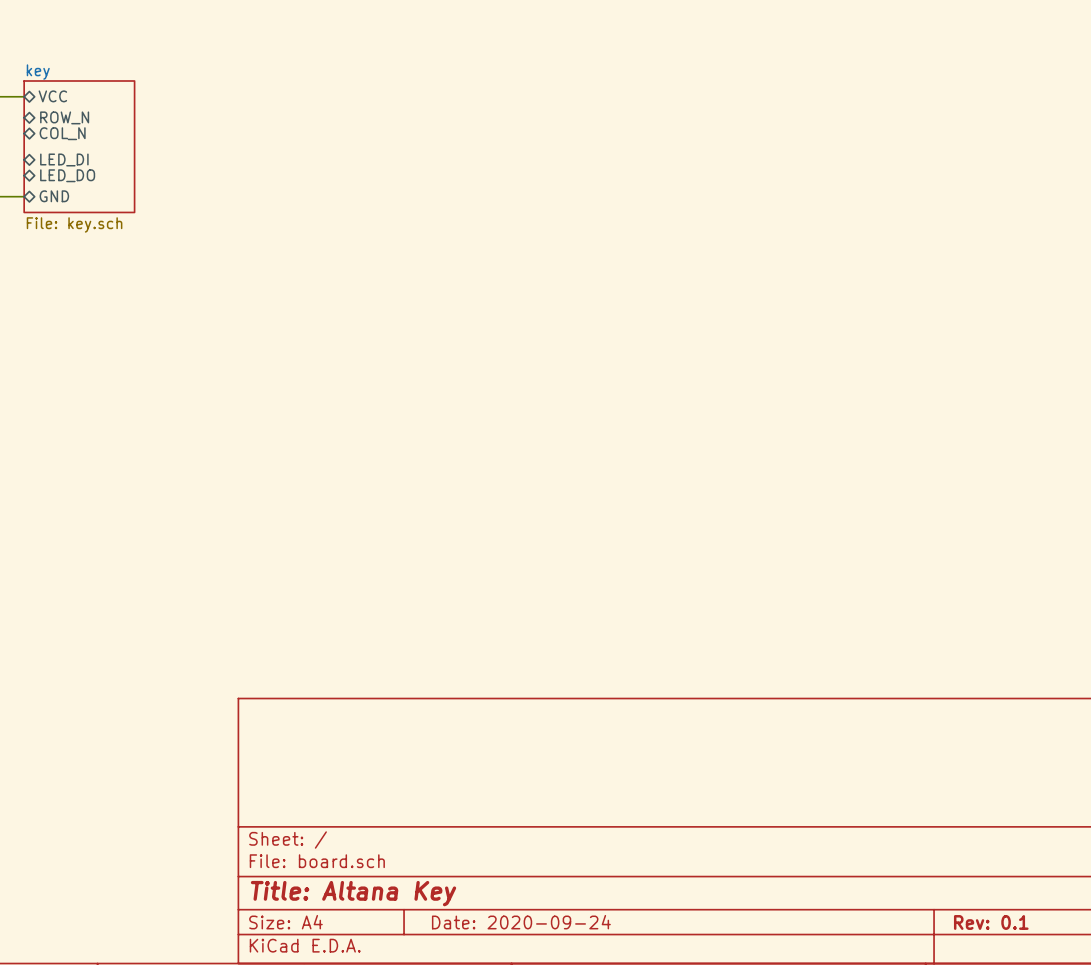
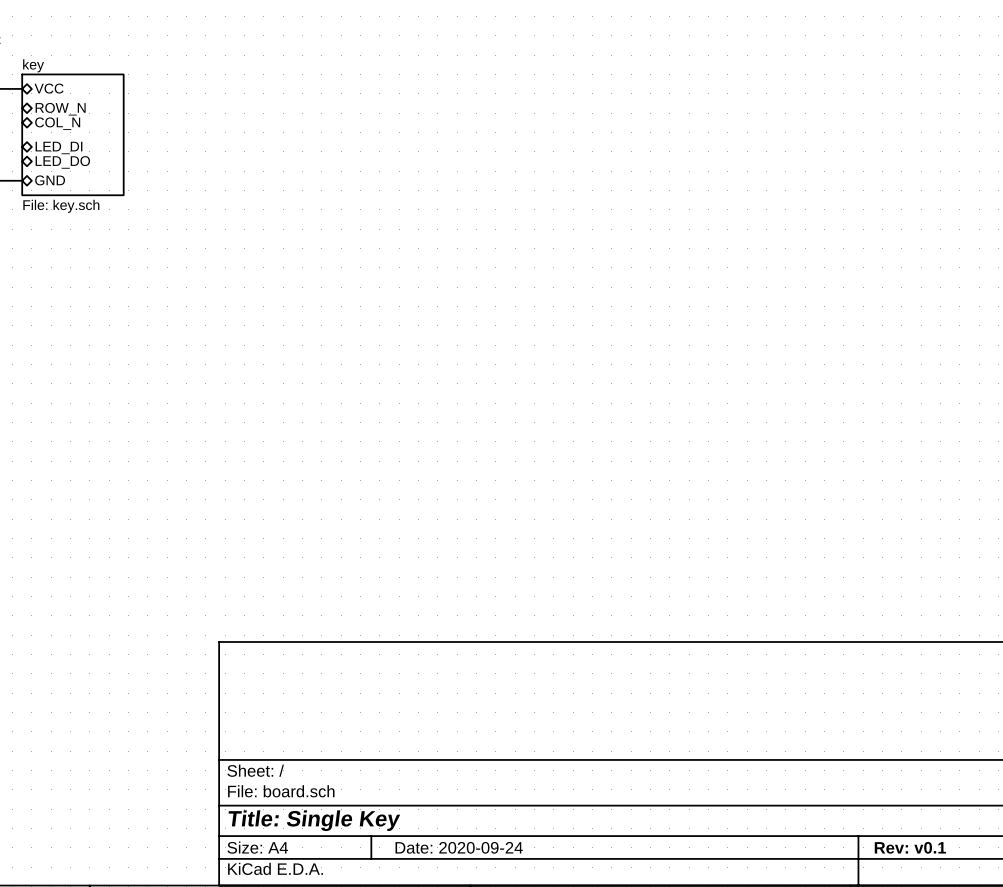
title block: Title: Altana Key (353, 893) -> Title: Single Key (314, 820)
title block: Rev: 0.1 (991, 922) -> Rev: v0.1 (910, 847)

